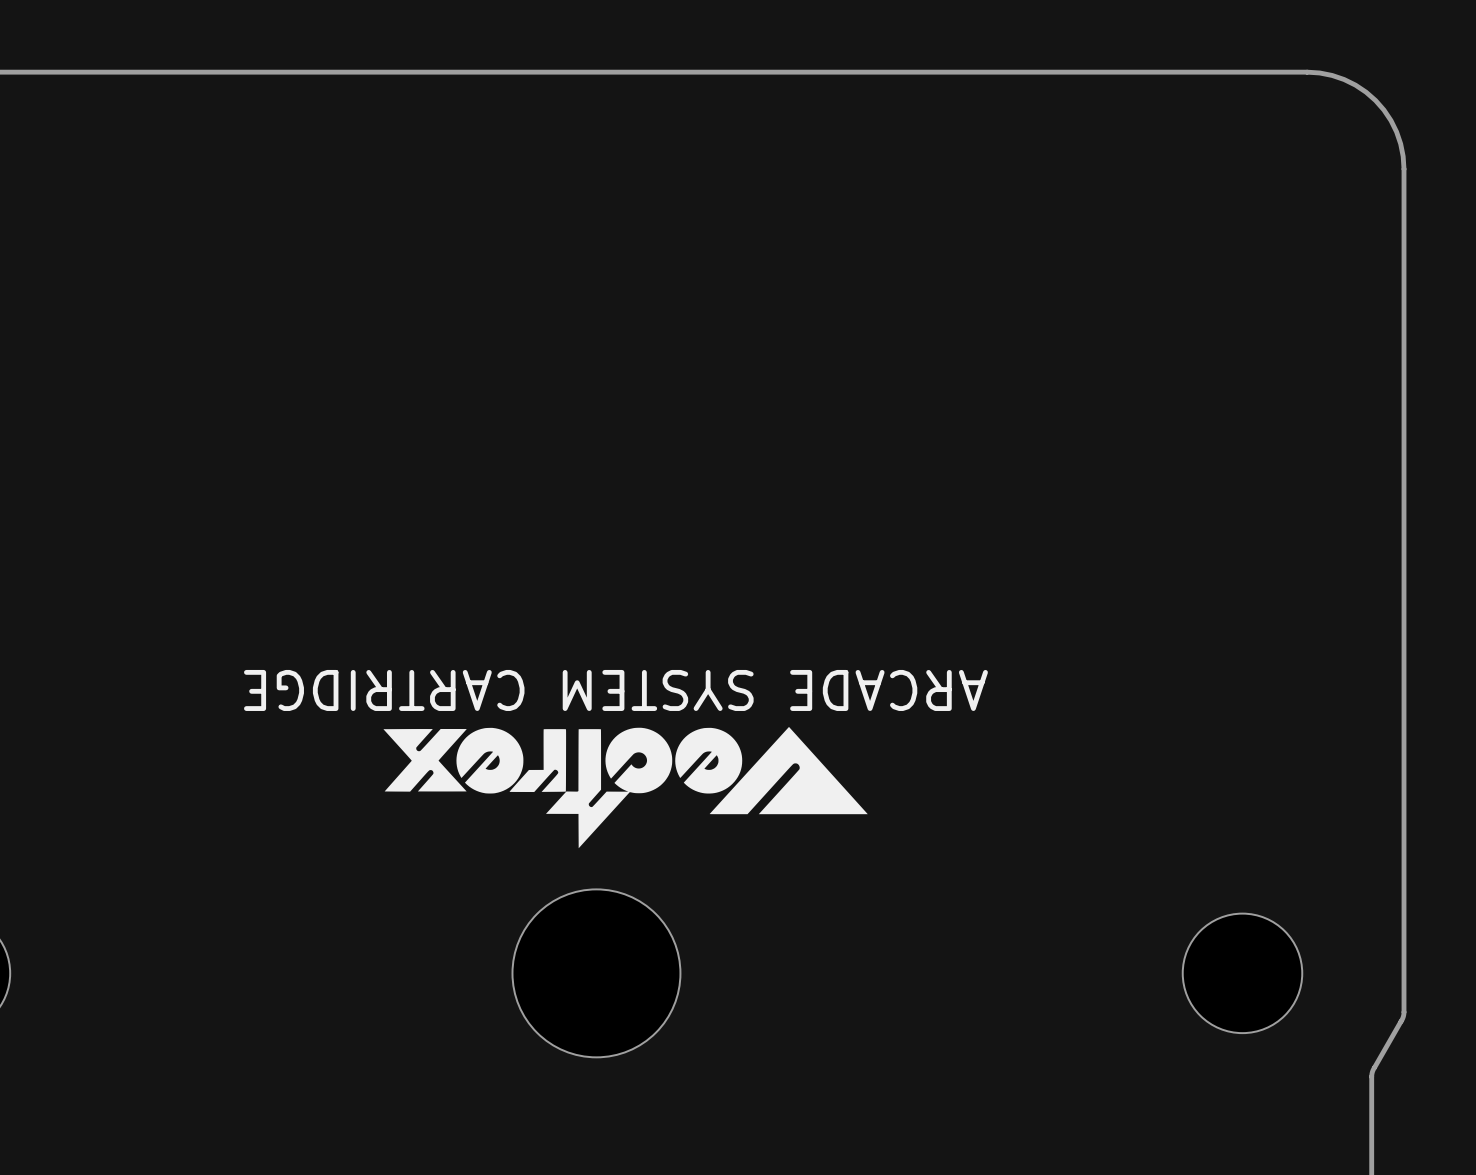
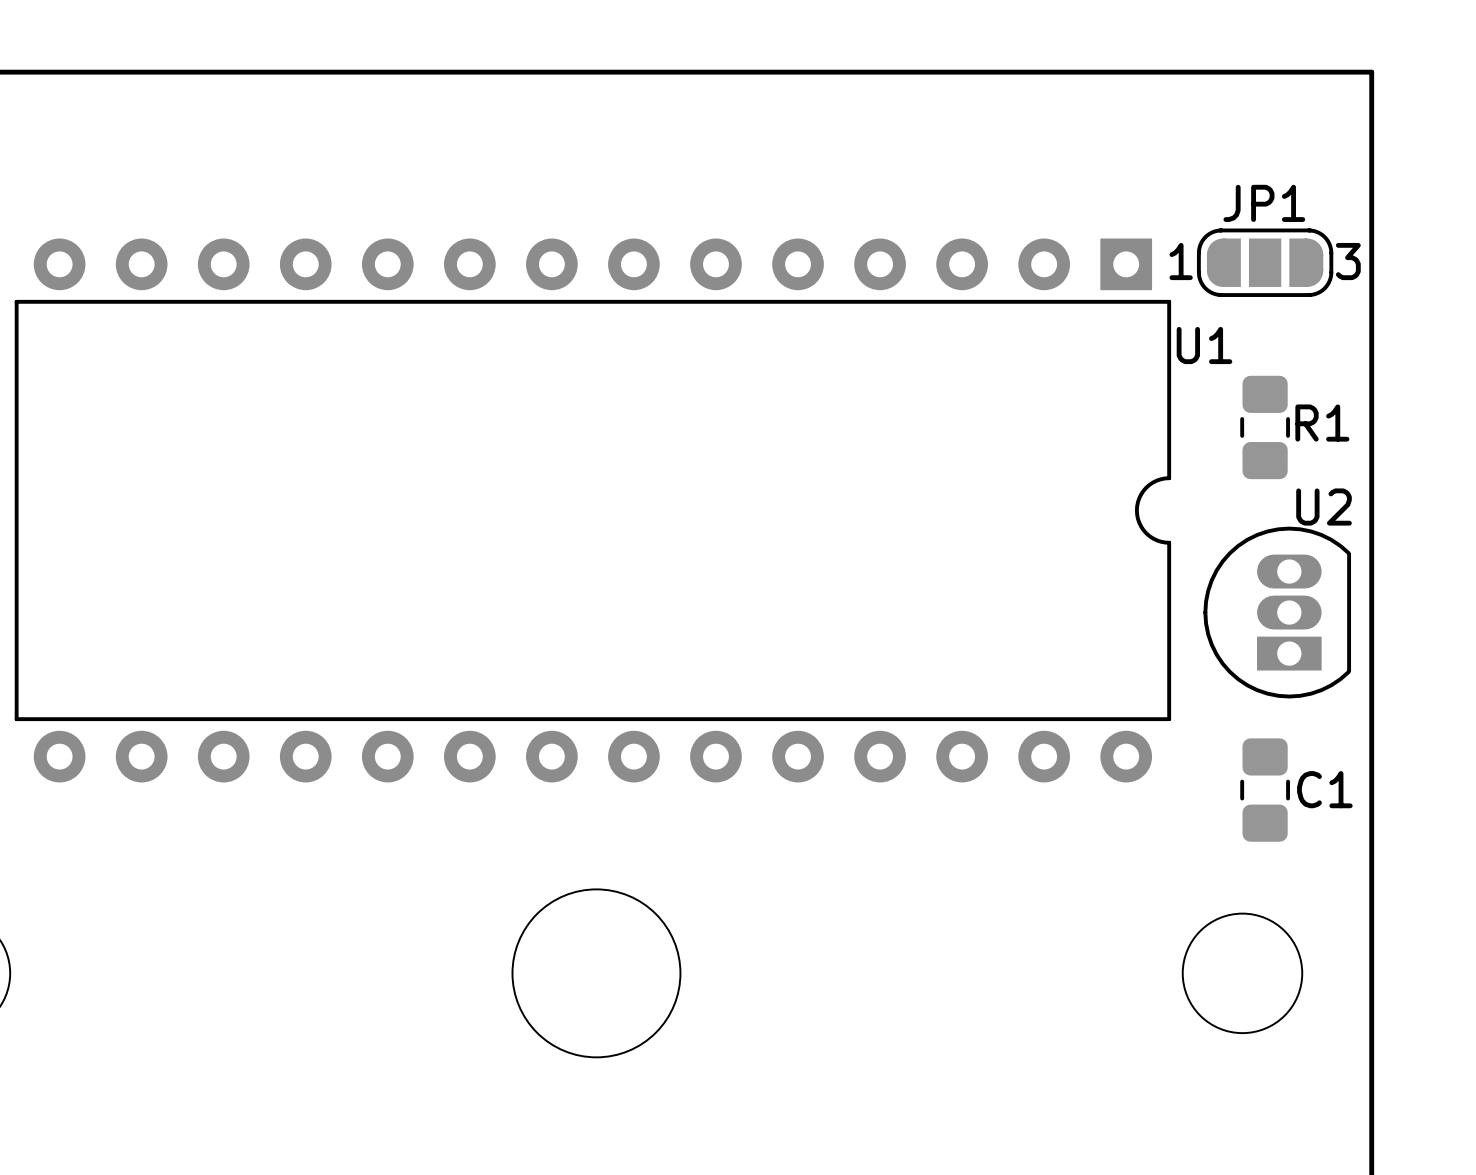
board edge: (1307, 72) (1319, 72) (1344, 79) (1355, 85) (1375, 100) (1383, 110) (1396, 131) (1400, 143) (1404, 169) (1404, 1012) (1401, 1020) (1373, 1068) (1371, 1076) -> (1307, 72) (1371, 72) (1371, 1076)
JP1: none -> (1265, 262)
R1: none -> (1265, 427)
U1: none -> (592, 510)
U2: none -> (1277, 612)
text: ARCADE SYSTEM CARTRIDGE (615, 690) -> none
drawing: [383, 726, 868, 849] -> none
C1: none -> (1265, 790)

